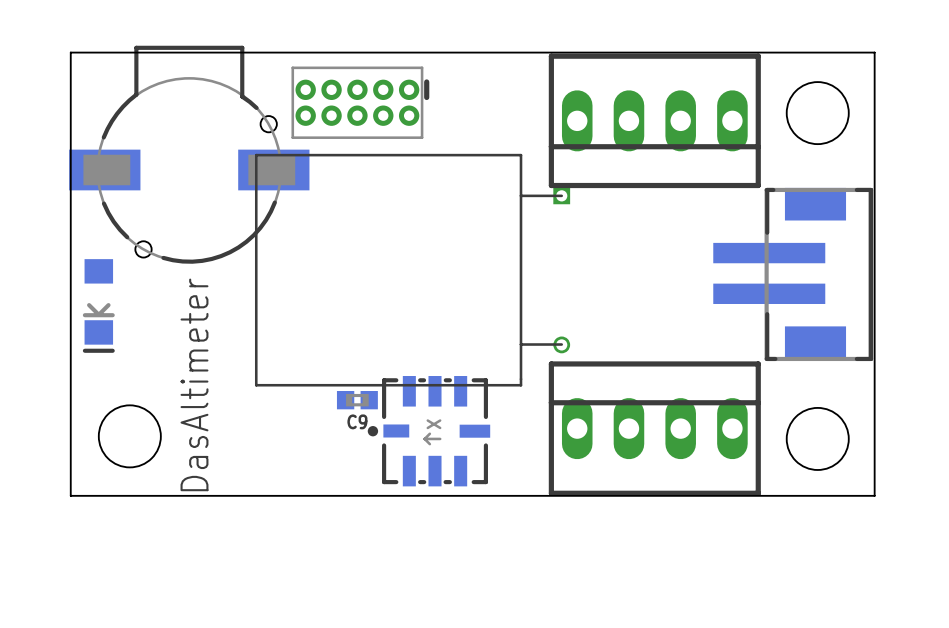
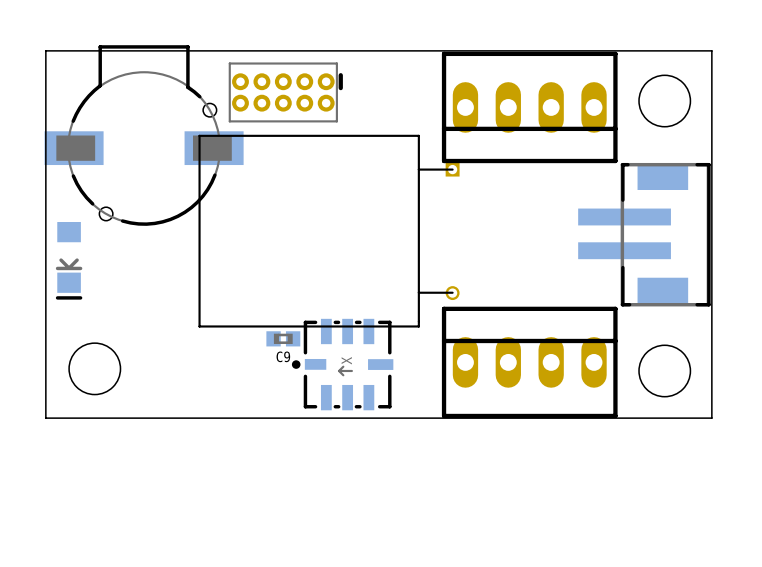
text: DasAltimeter (194, 384) -> none

